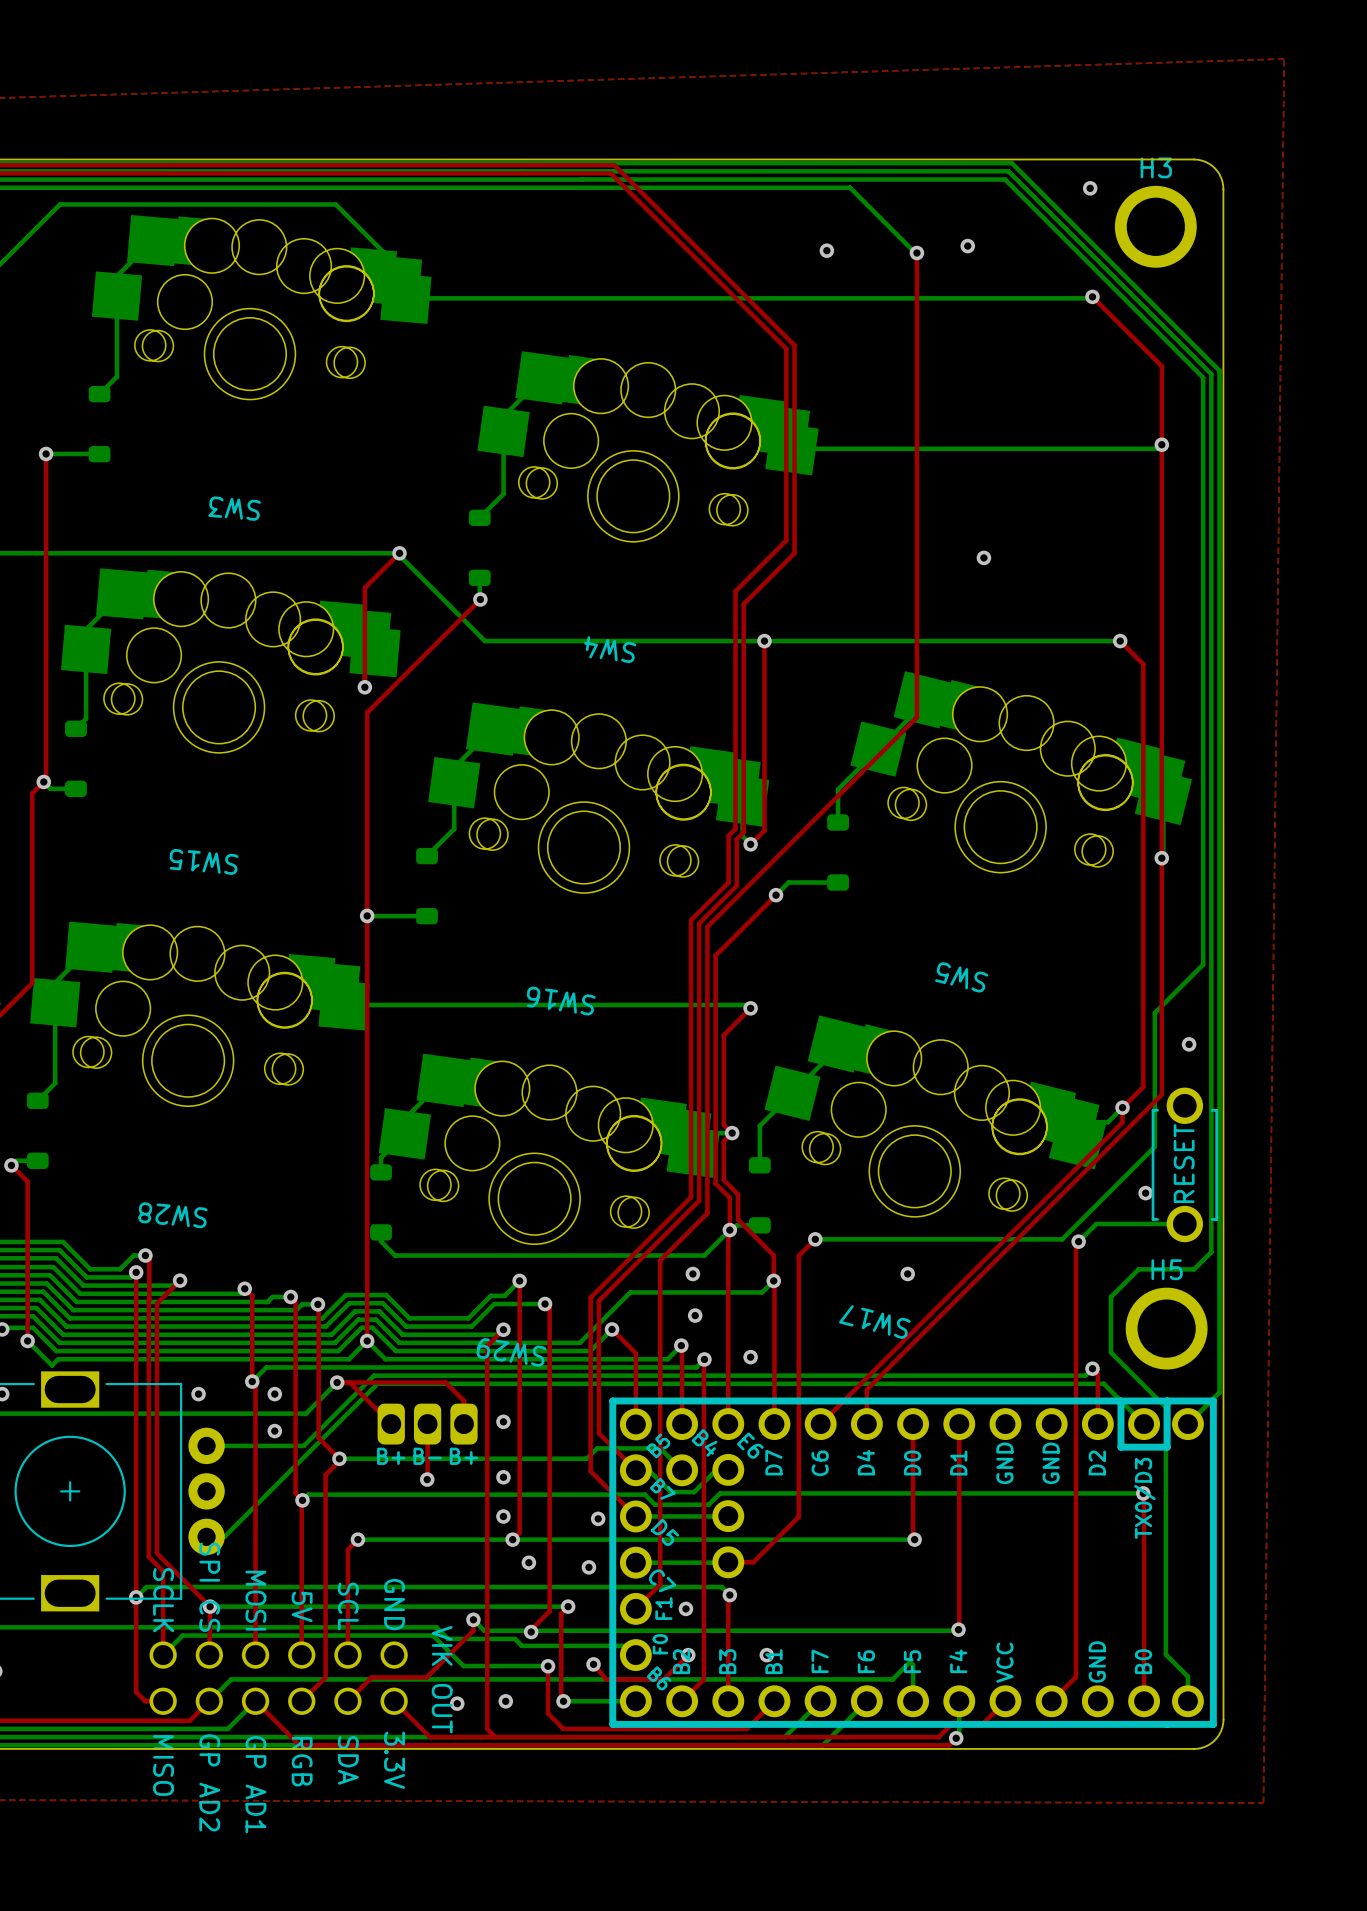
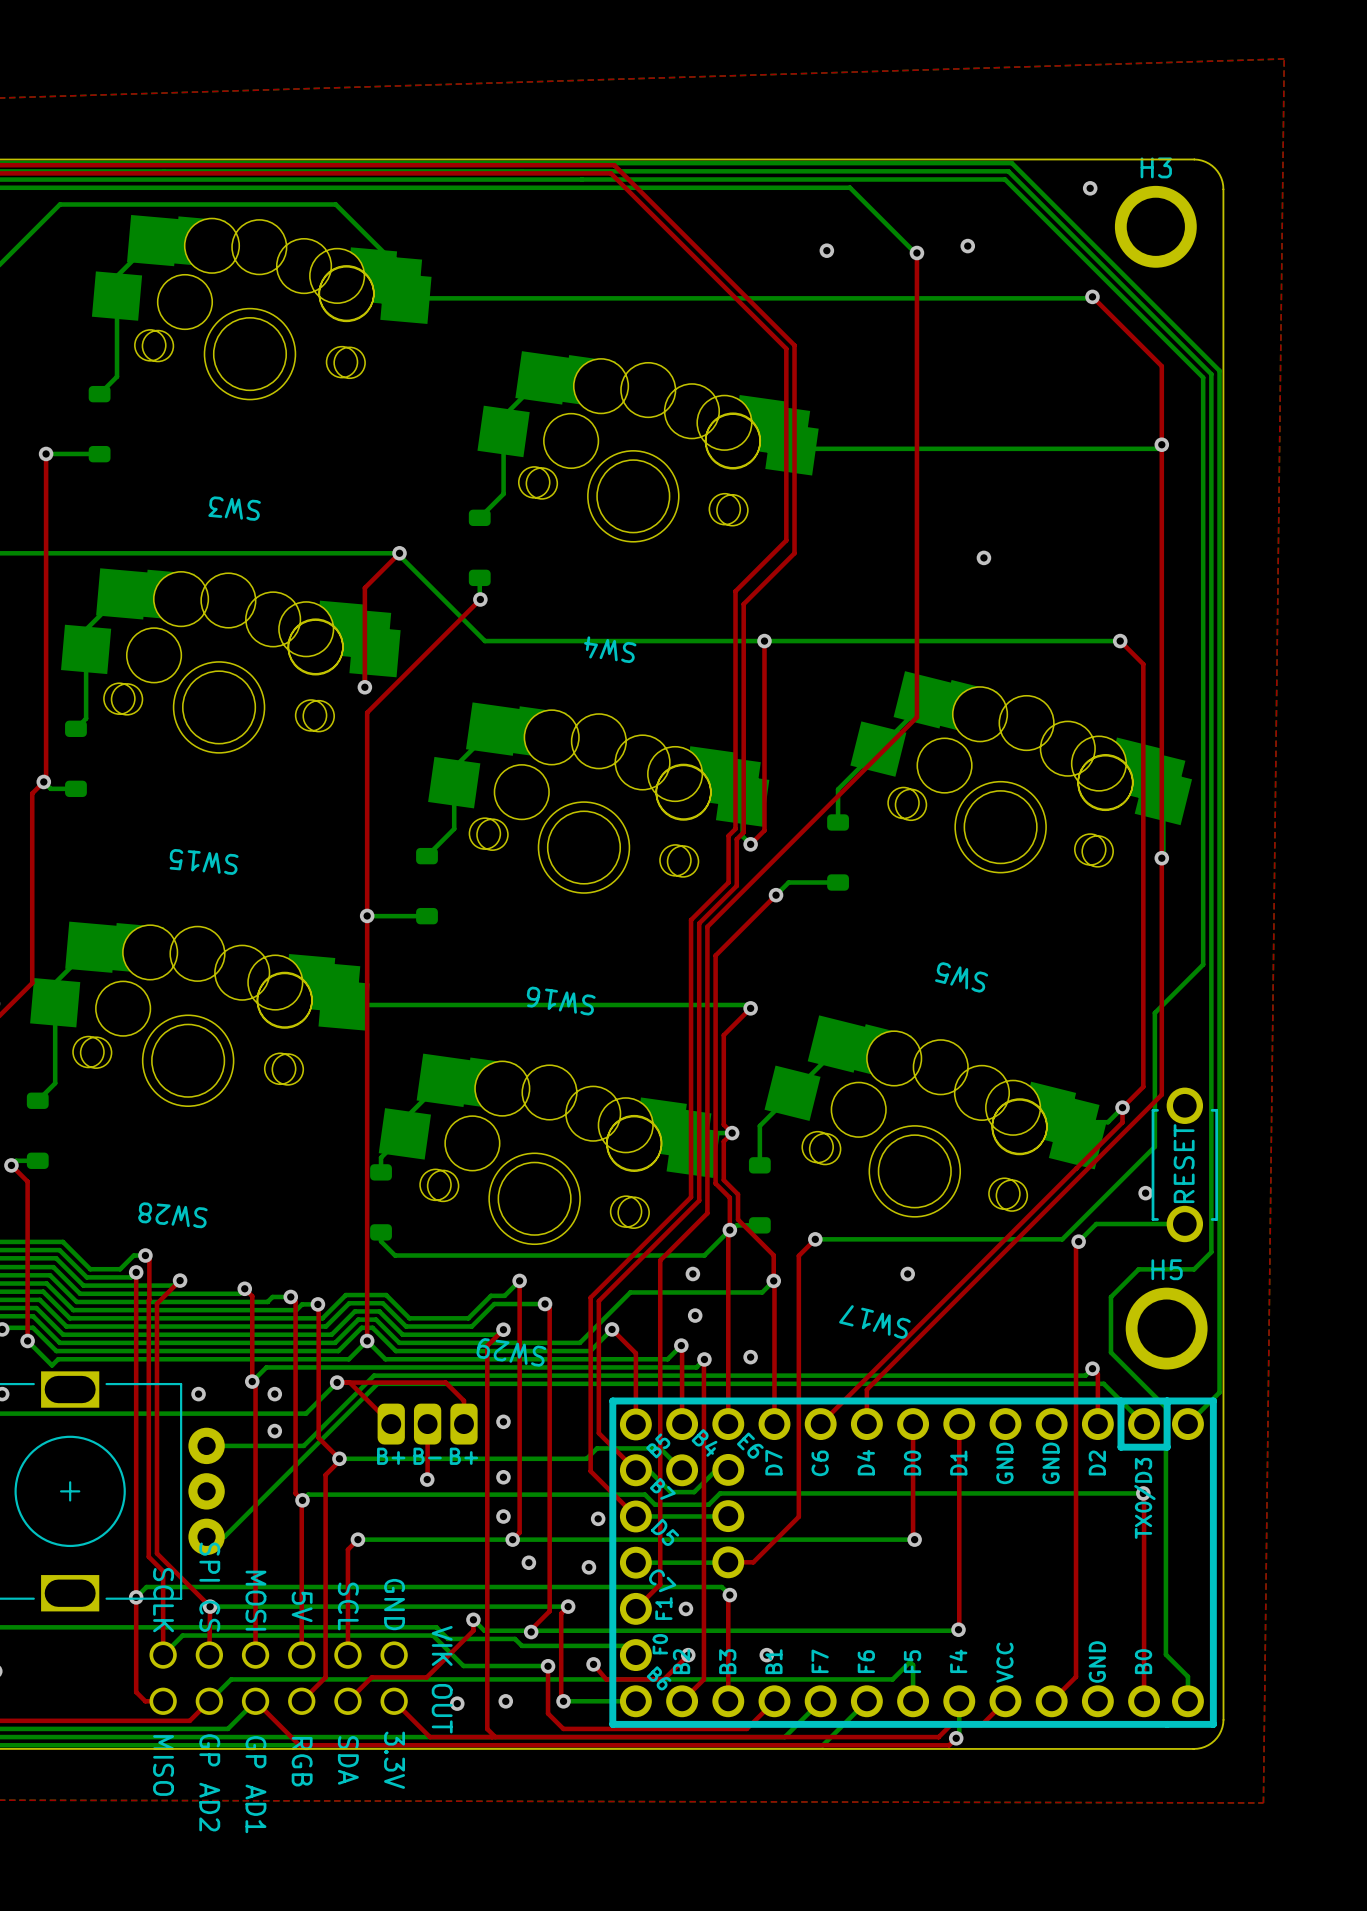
via: (1189, 1044) -> none

